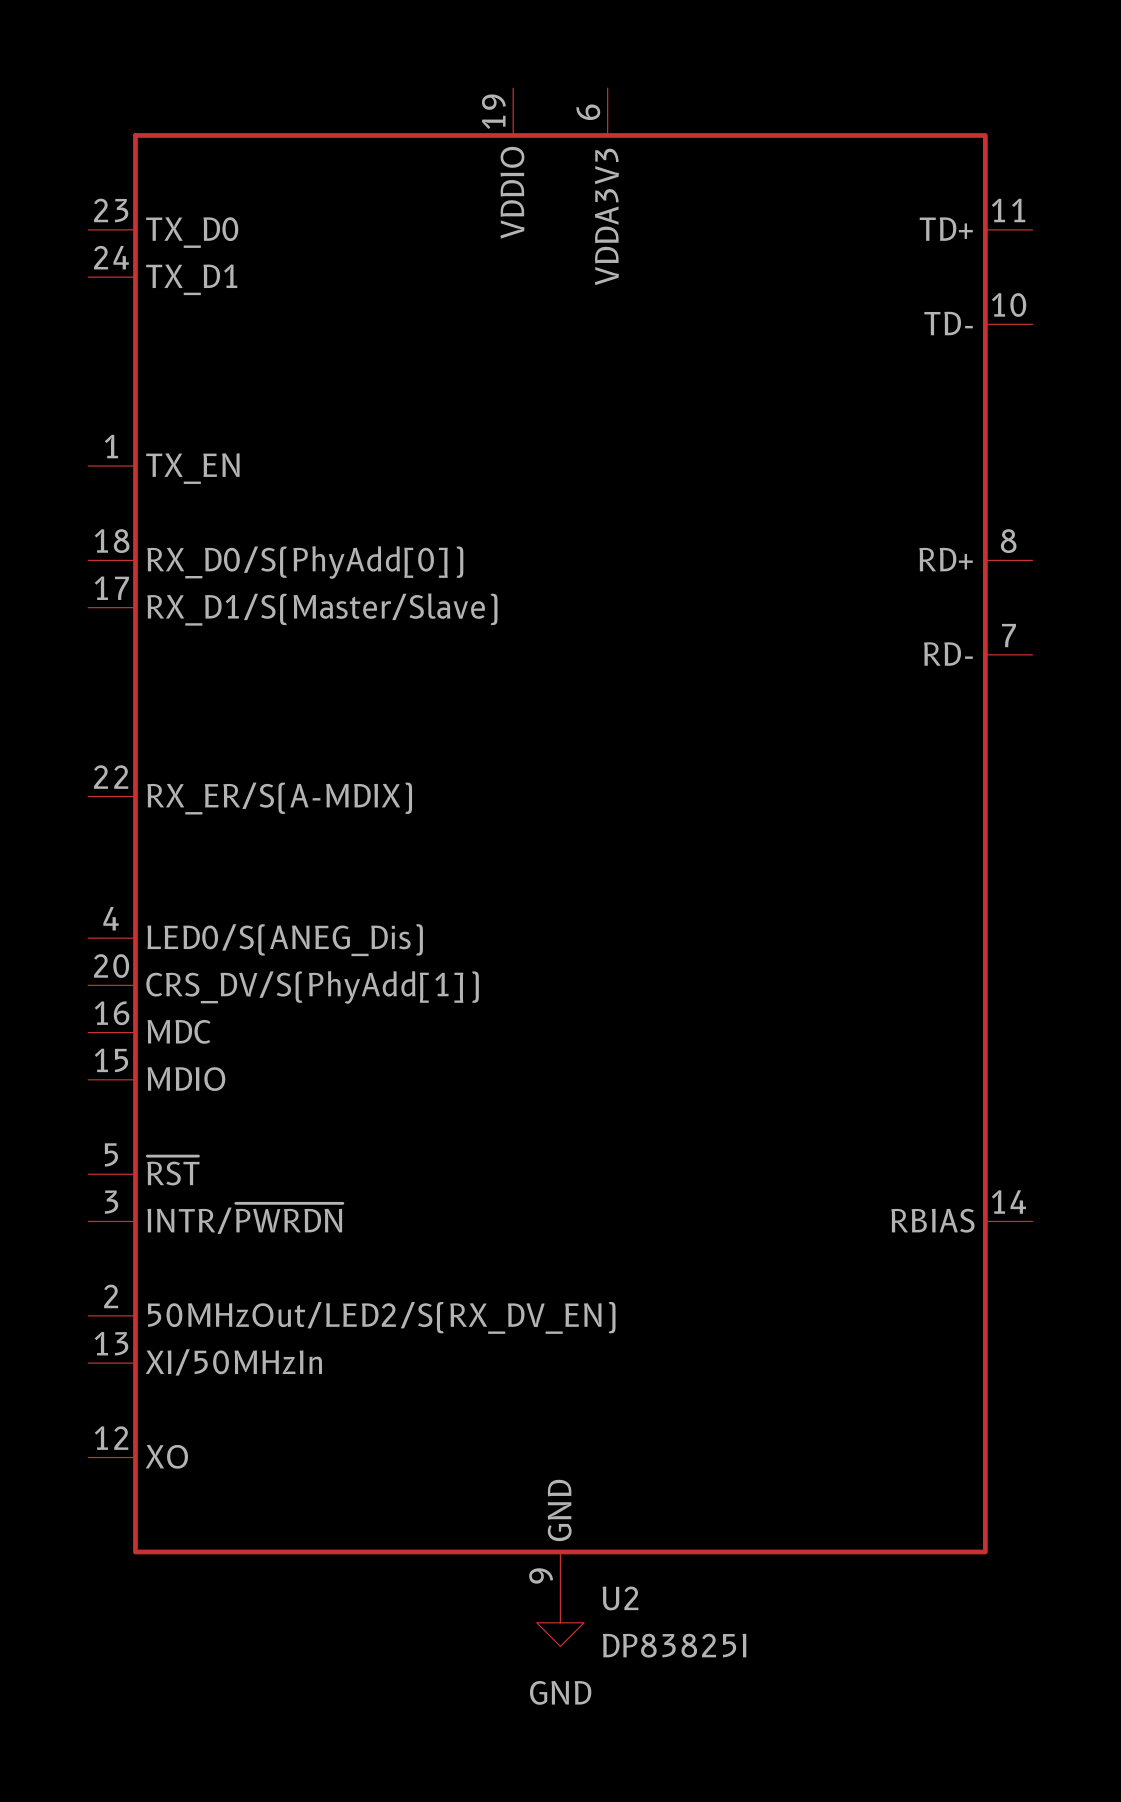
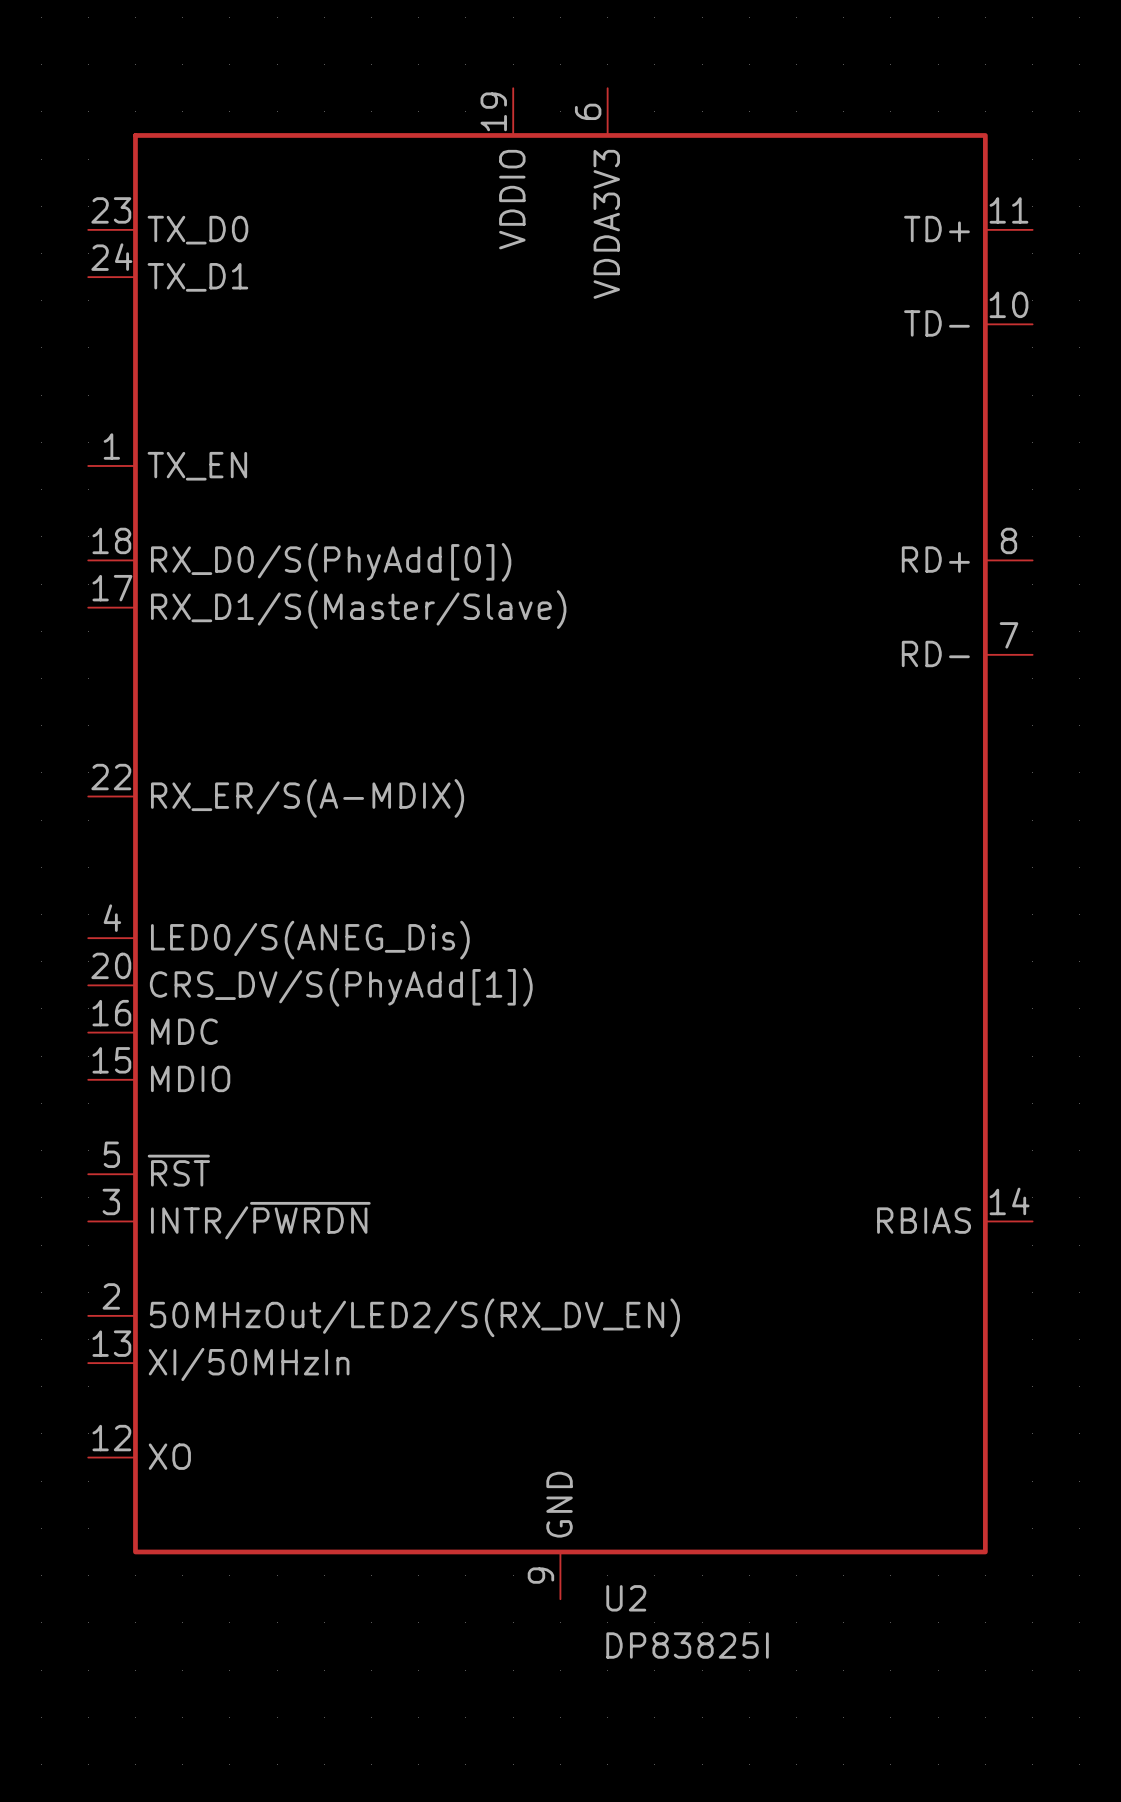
power symbol: GND (560, 1622) -> none

